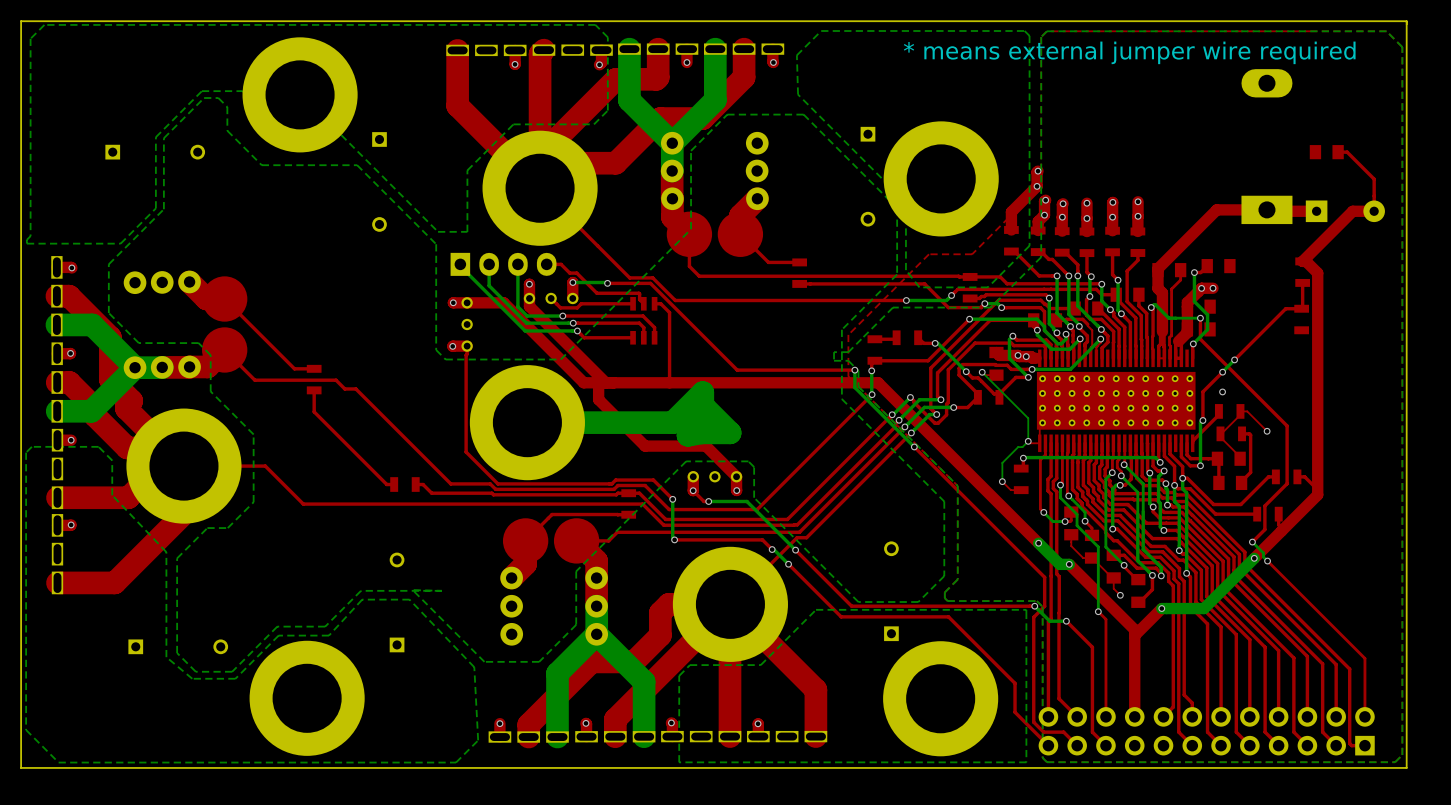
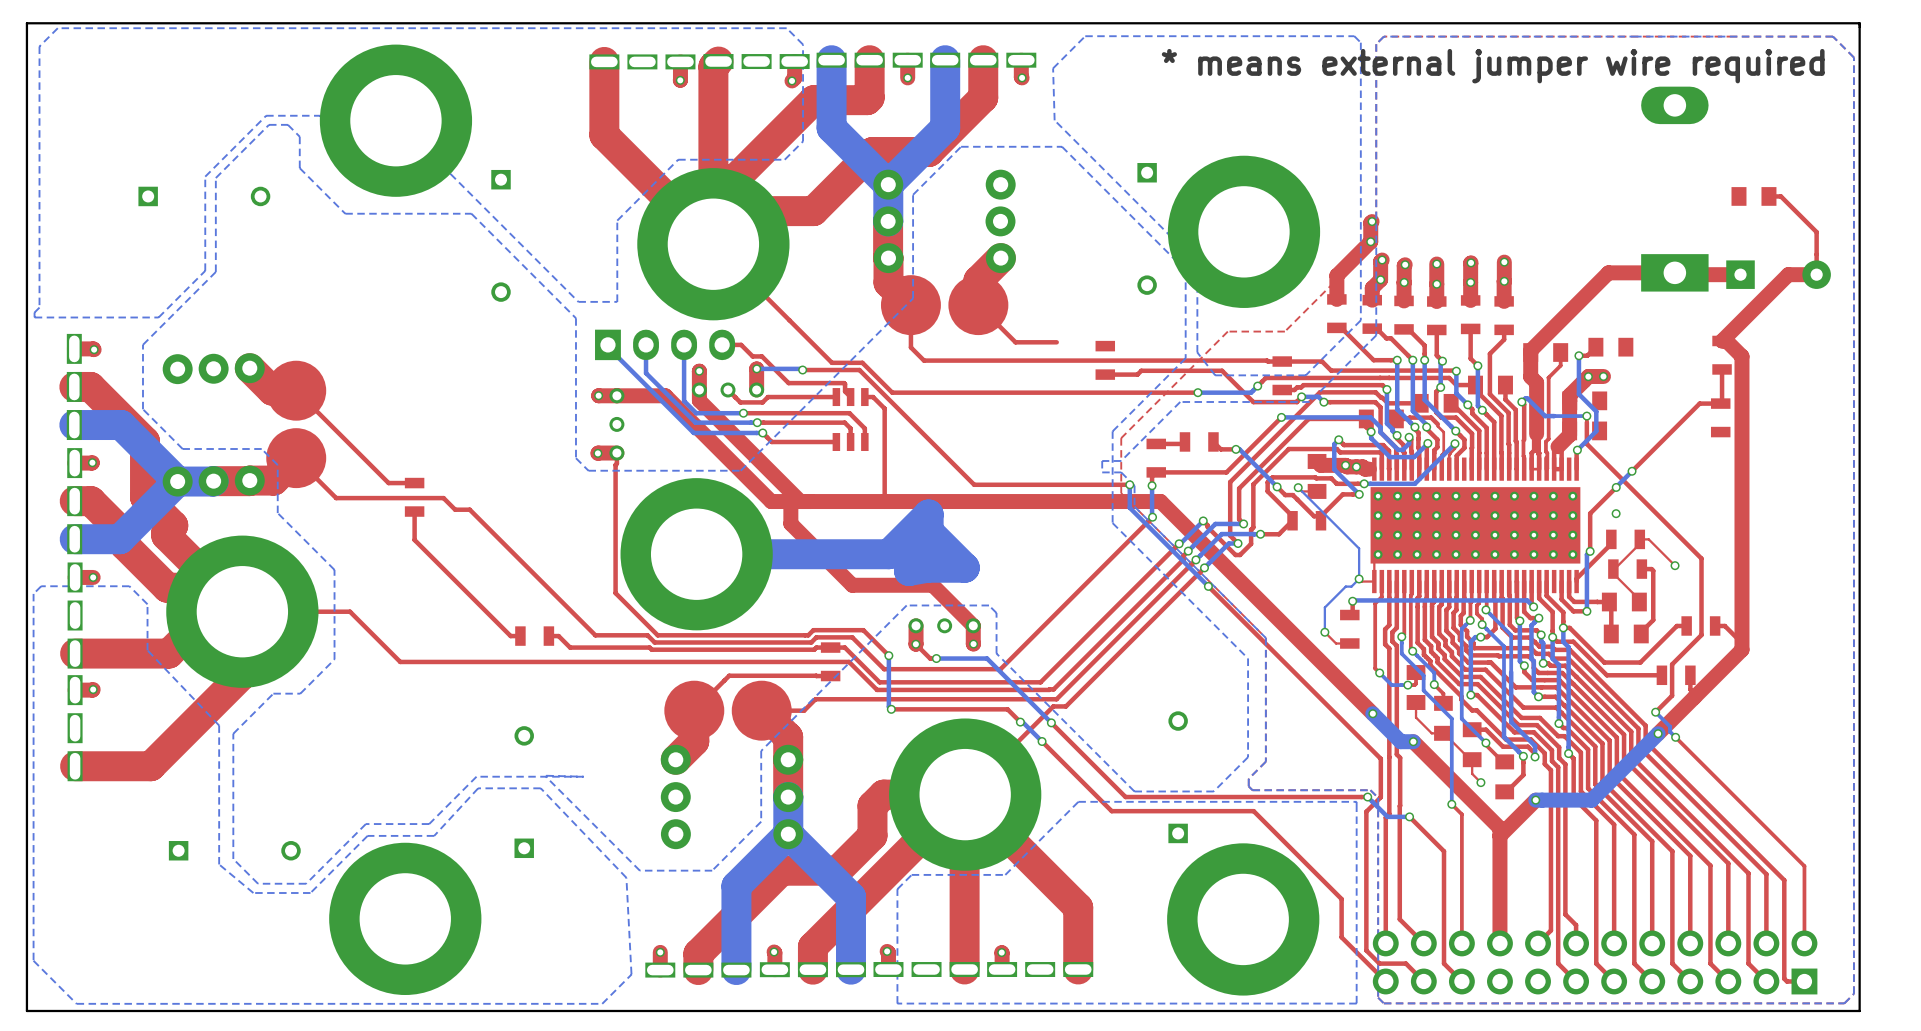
part position: (799, 273) -> (1105, 360)
top track: (863, 283) (799, 283) -> (1141, 370) (1137, 374) (1105, 374)

